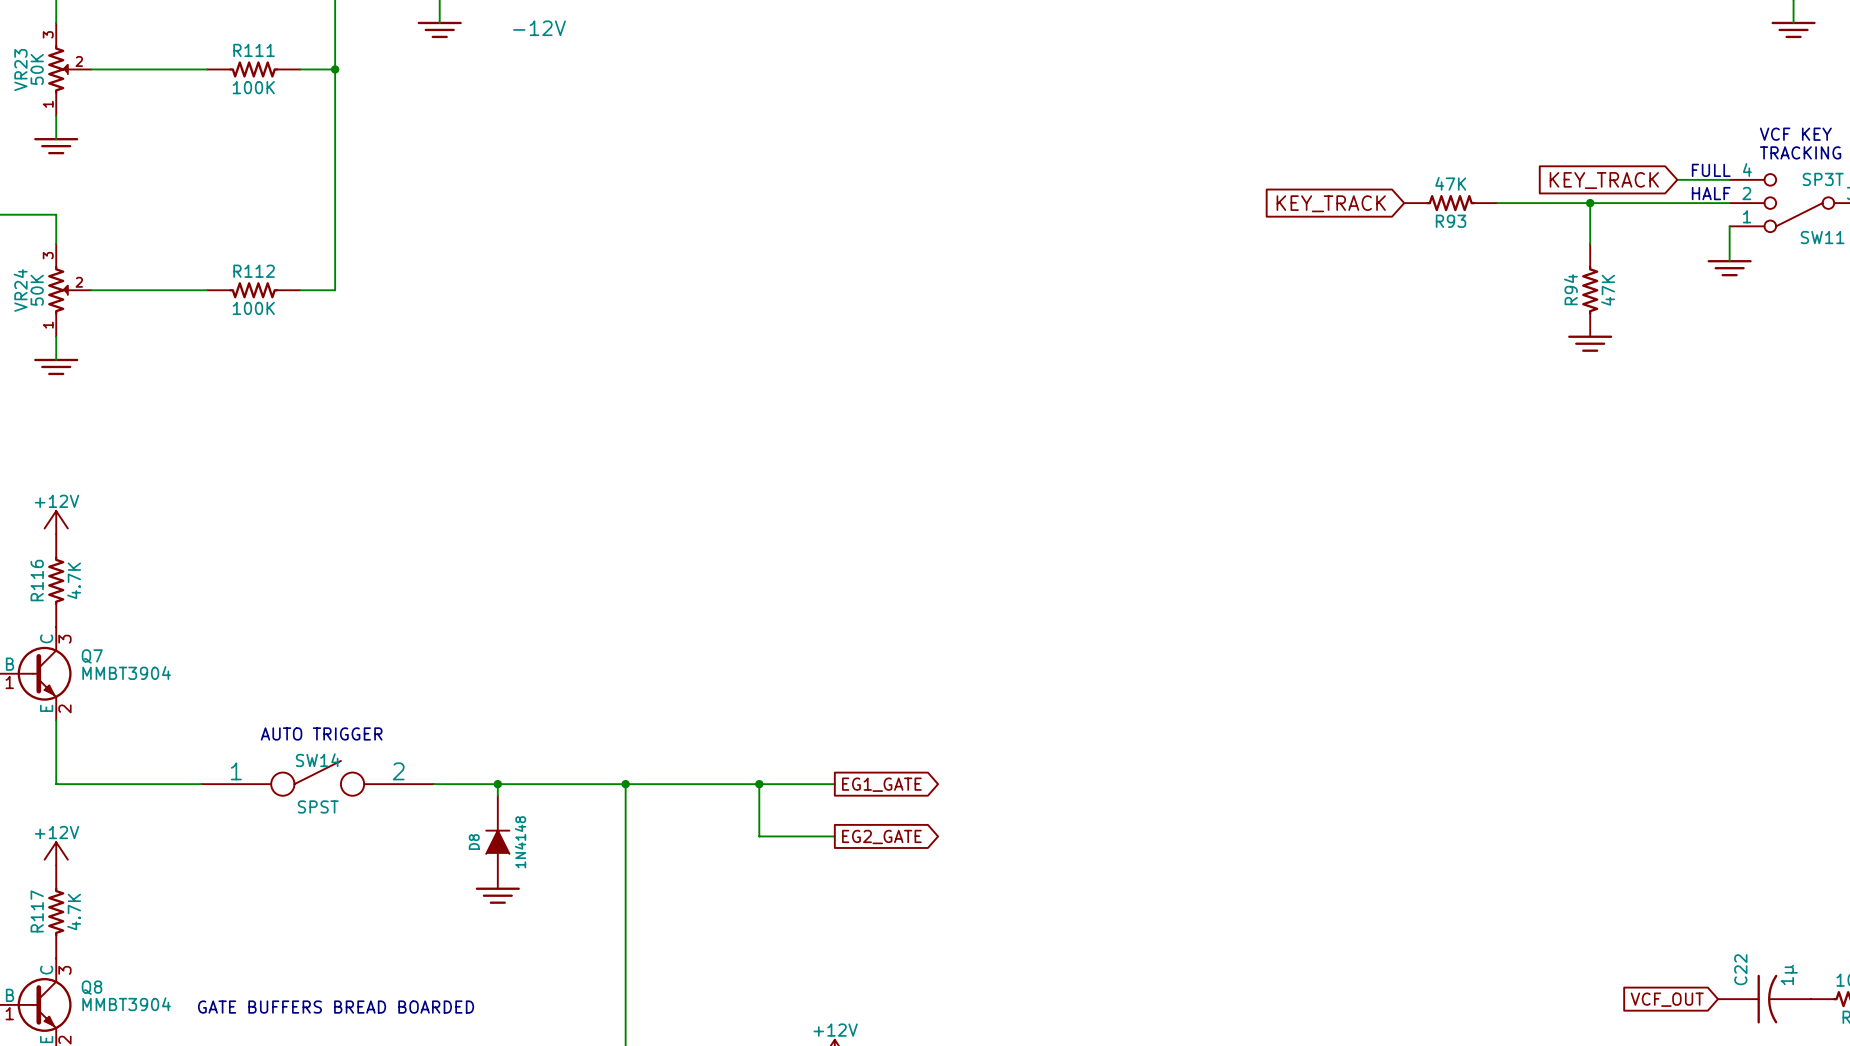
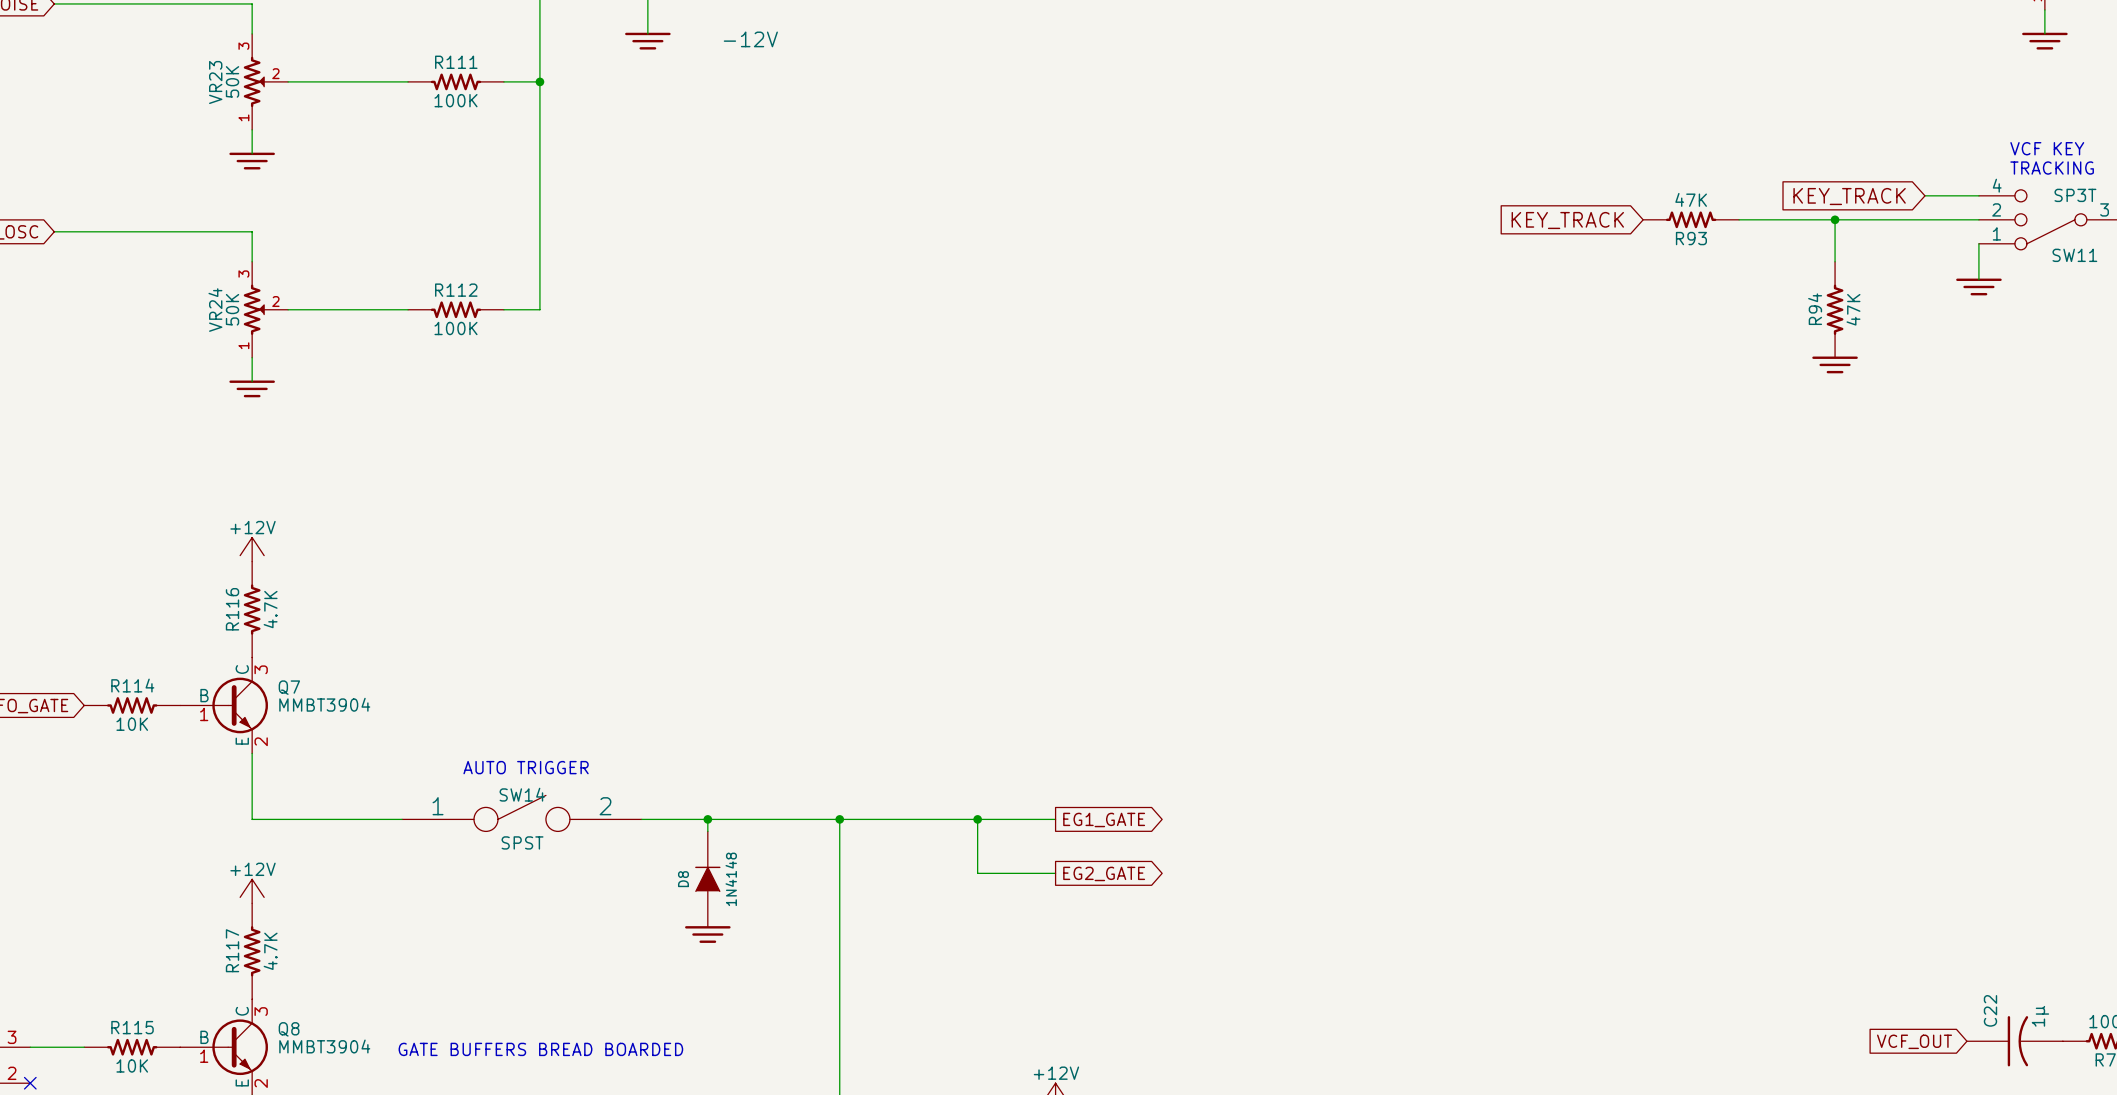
text: FULL (1711, 170) -> none
text: HALF (1711, 193) -> none

